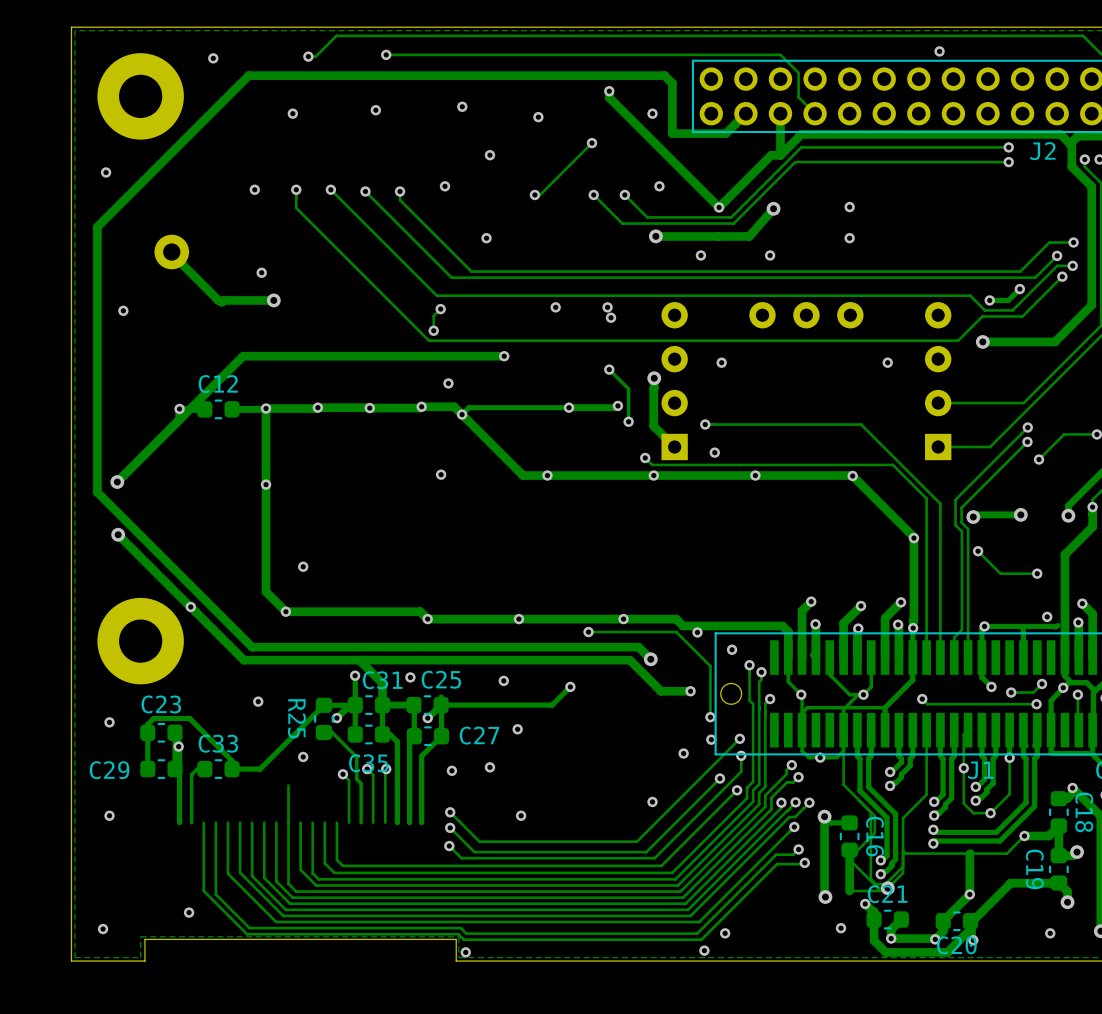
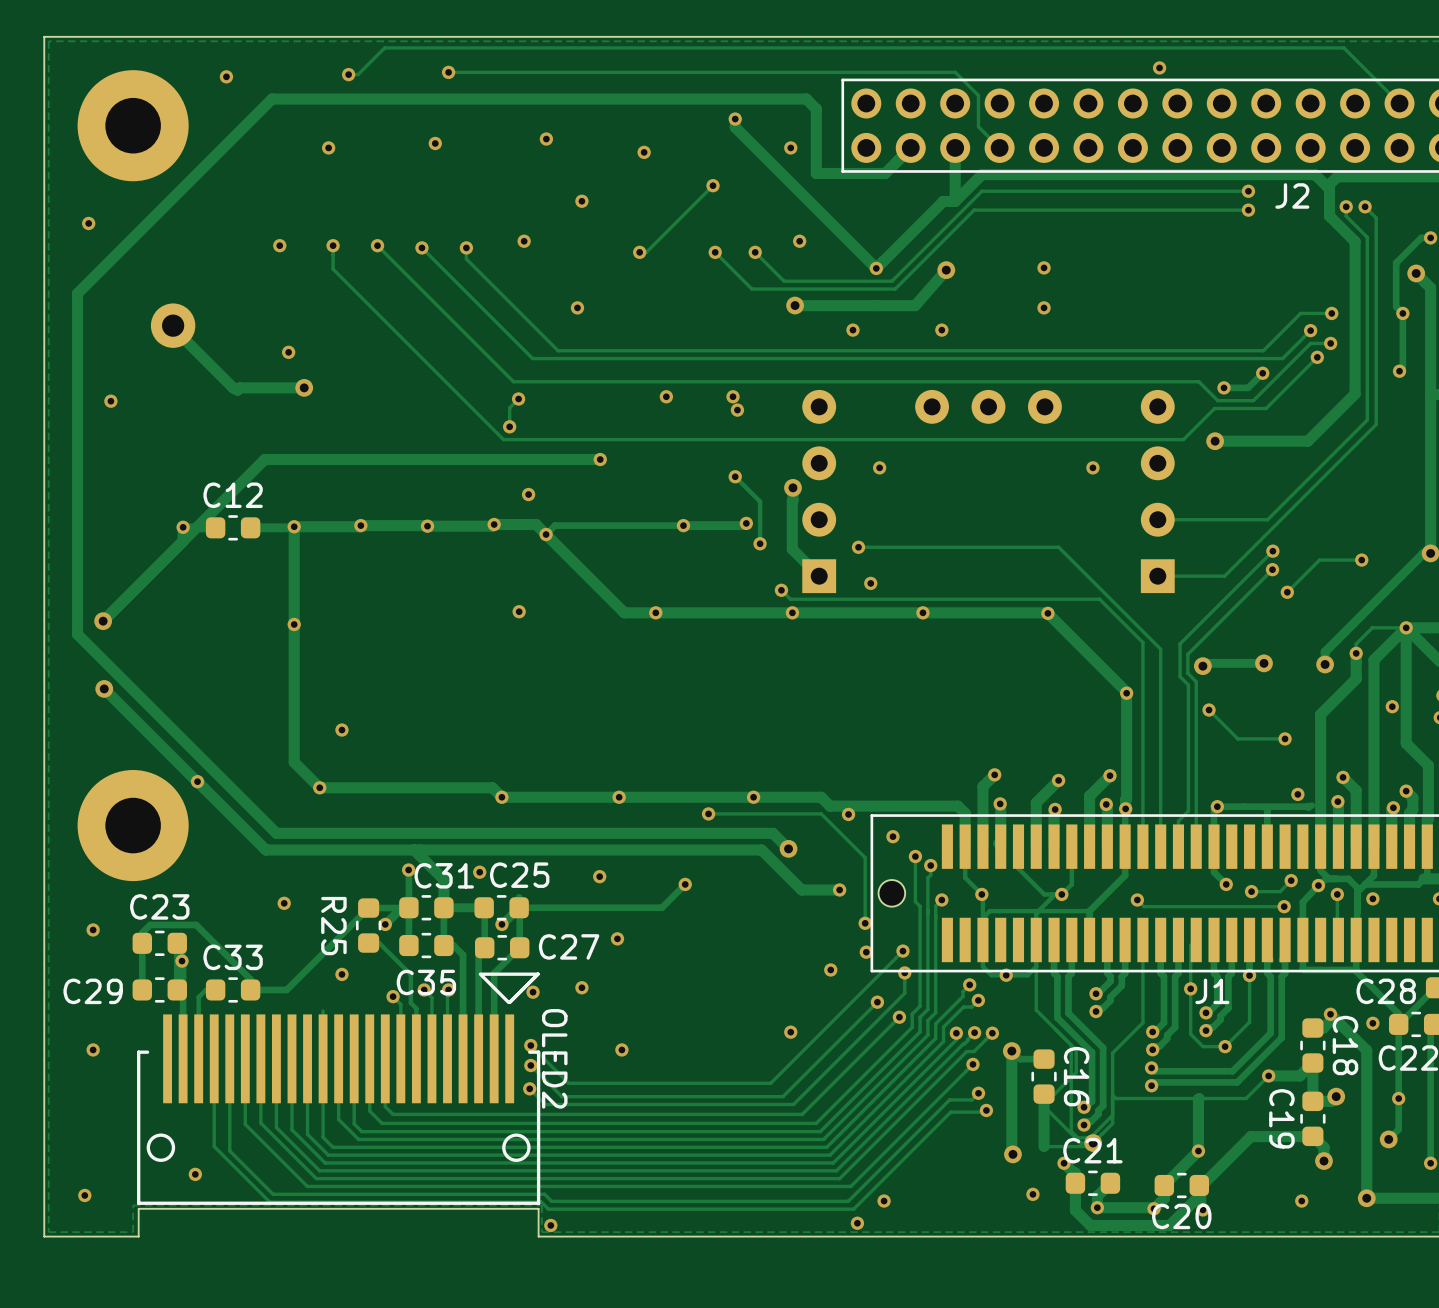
OLED2: none -> (338, 1088)

